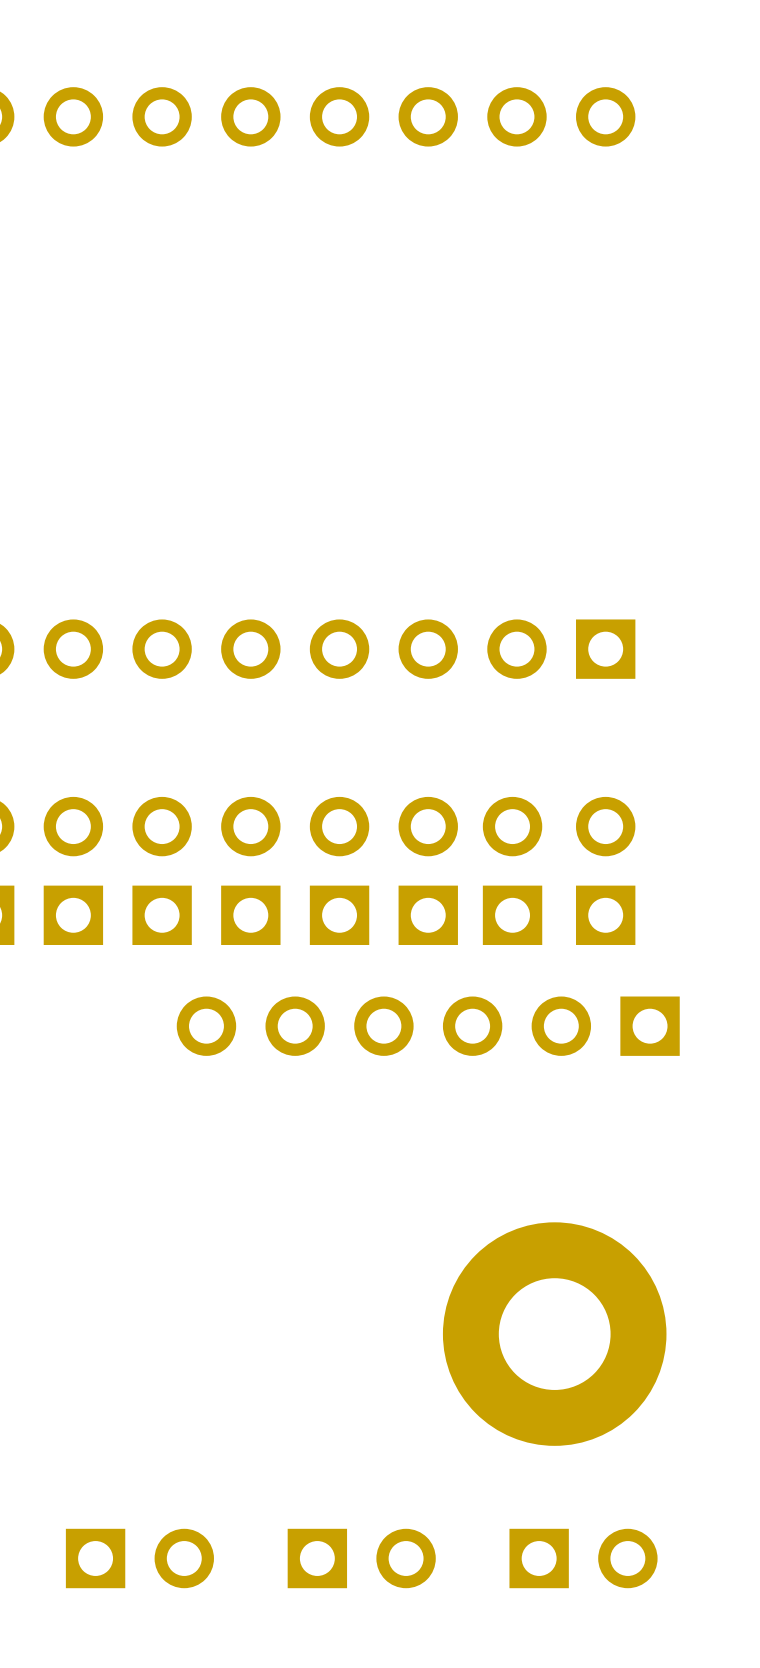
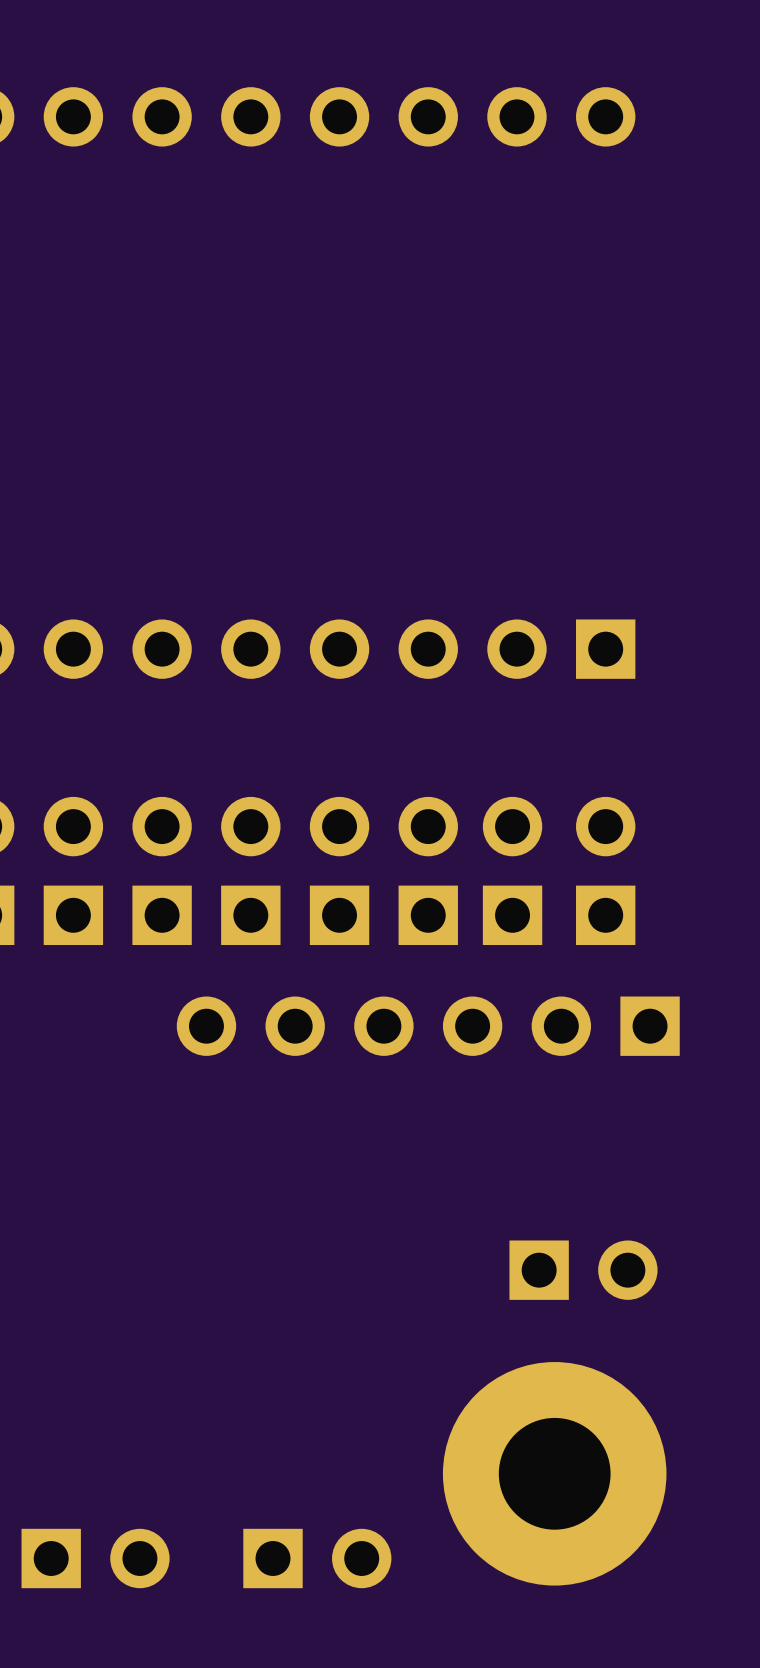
part: none -> (583, 1270)
part position: (554, 1334) -> (554, 1473)
part position: (139, 1558) -> (95, 1558)
part position: (361, 1558) -> (317, 1558)
part: (583, 1558) -> none

